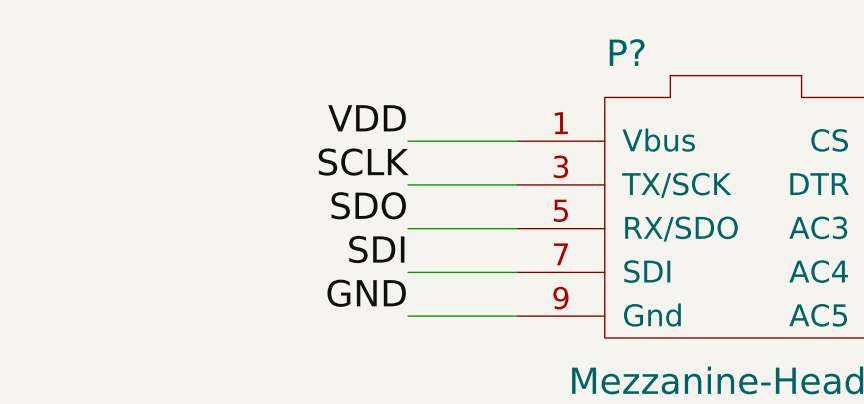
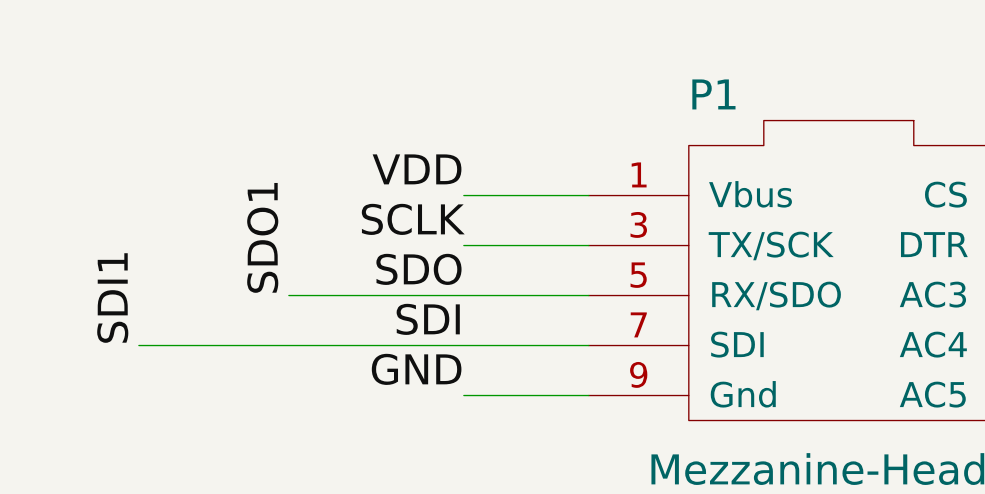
P? name: P? (627, 52) -> P1 (713, 94)
label: none -> SDO1 (262, 237)
wire: none -> (288, 295) (463, 295)
label: none -> SDI1 (112, 298)
wire: none -> (138, 345) (463, 345)

